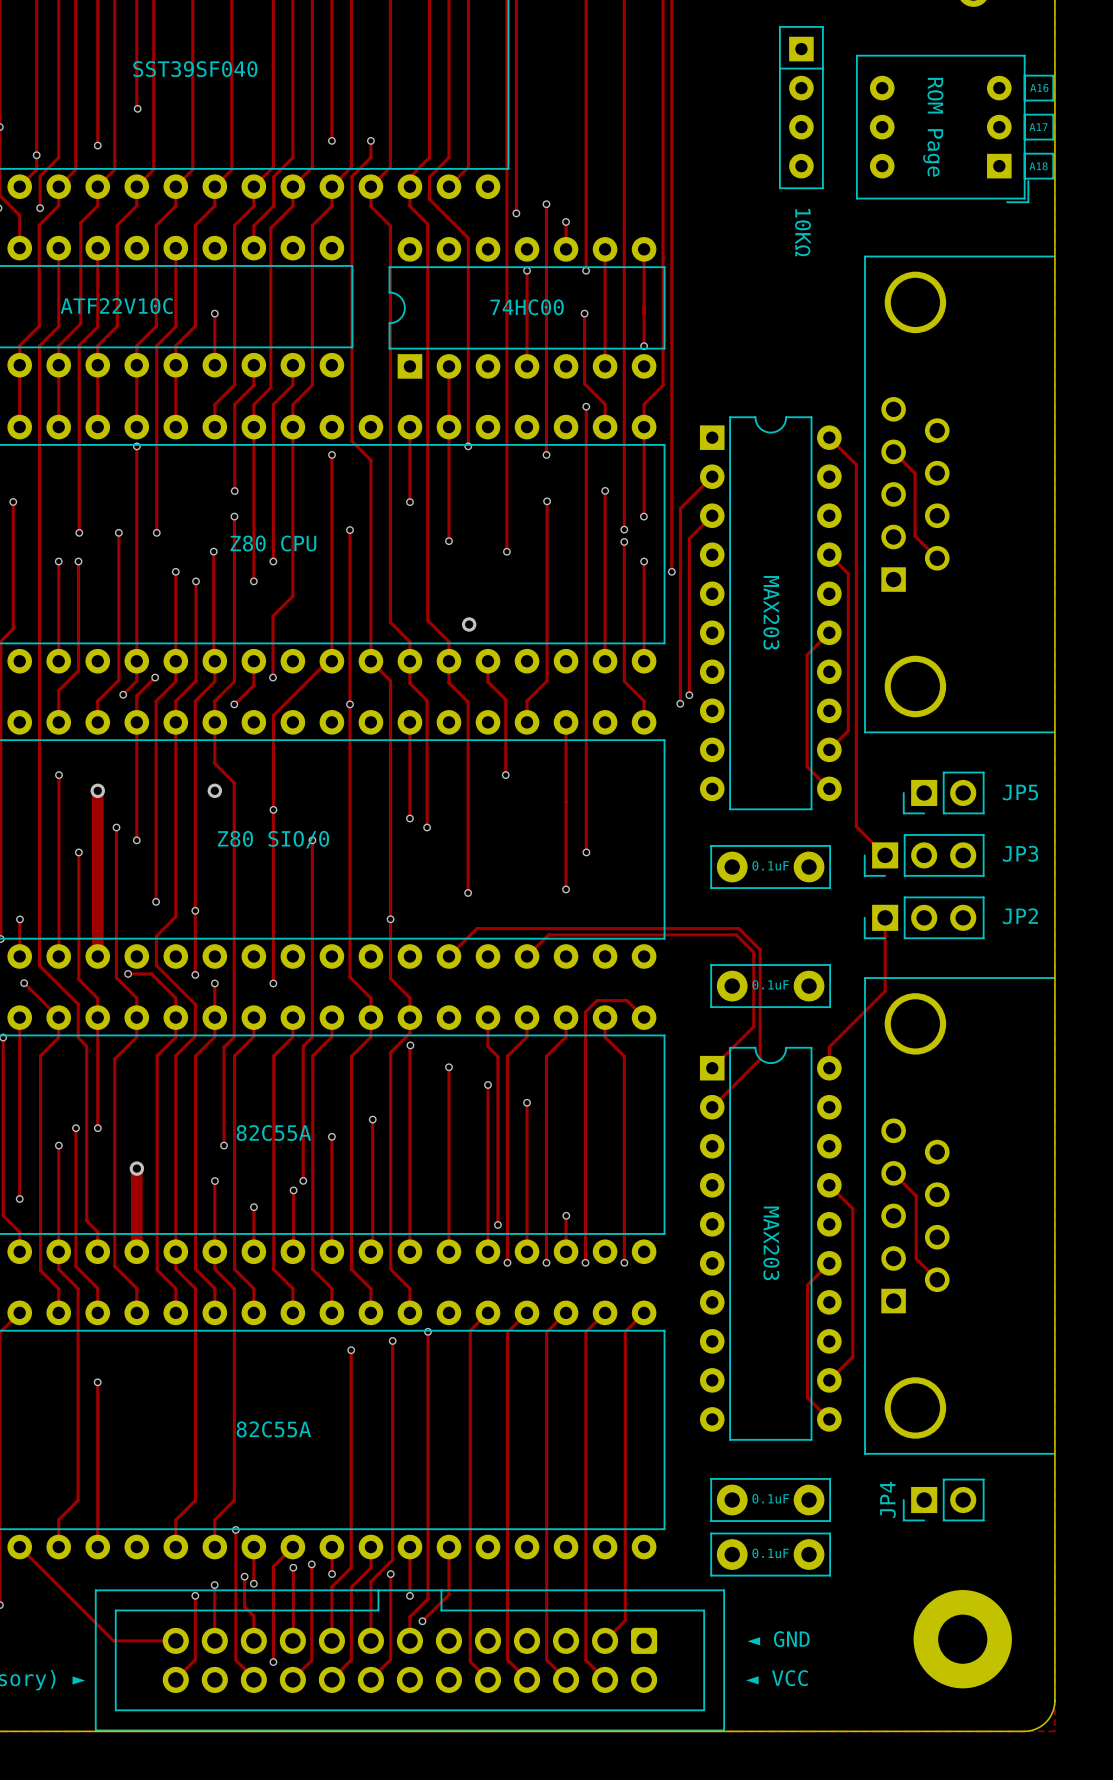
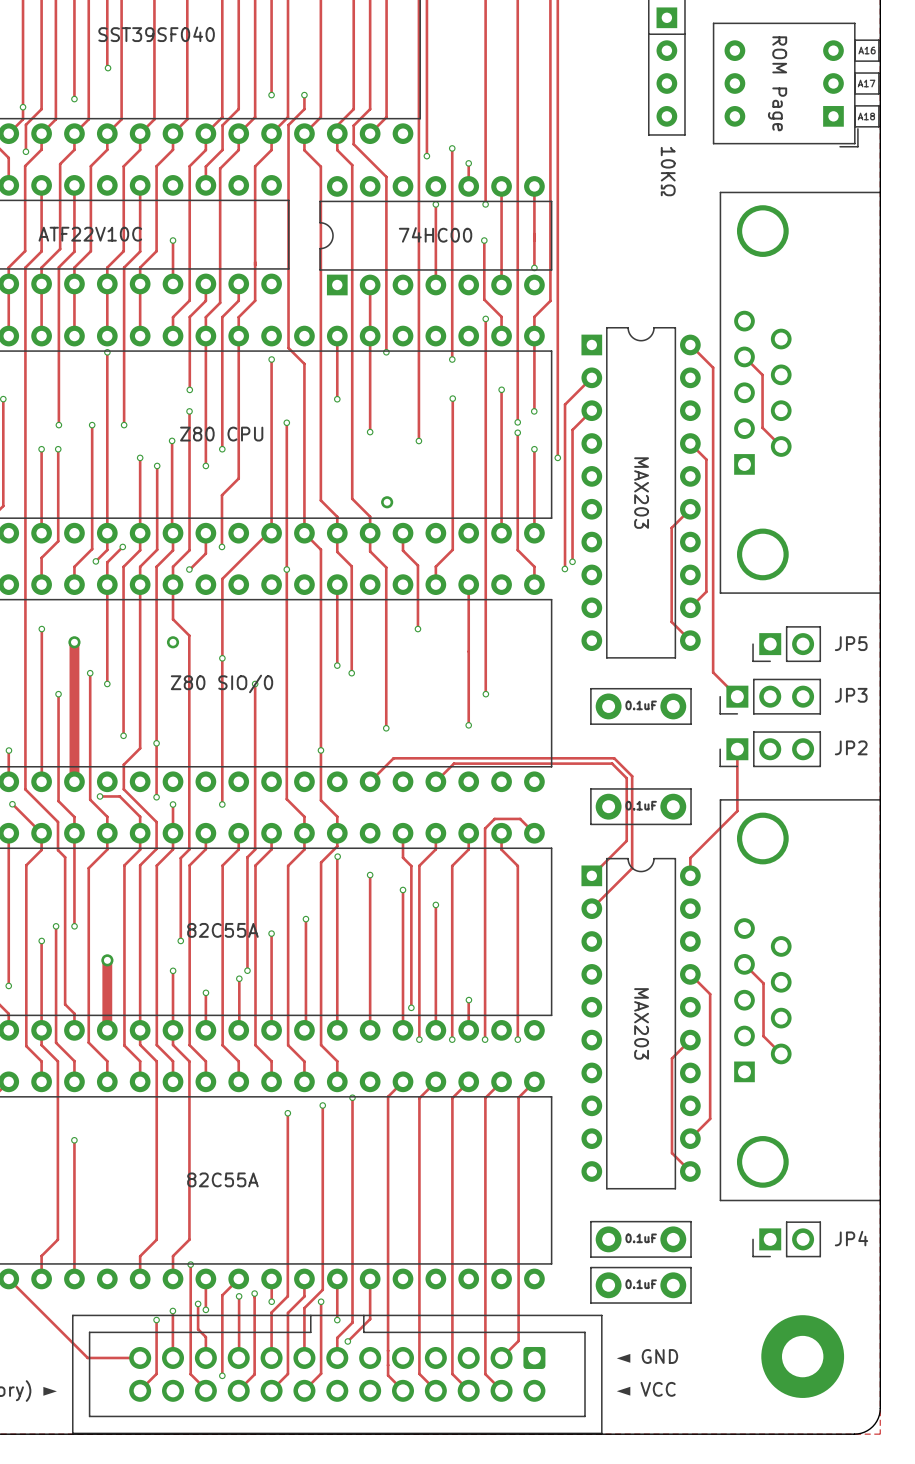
JP4 name rotation: 0° (887, 1499) -> 90° clockwise (851, 1238)
JP4 name position: JP4 (887, 1499) -> JP4 (851, 1238)

